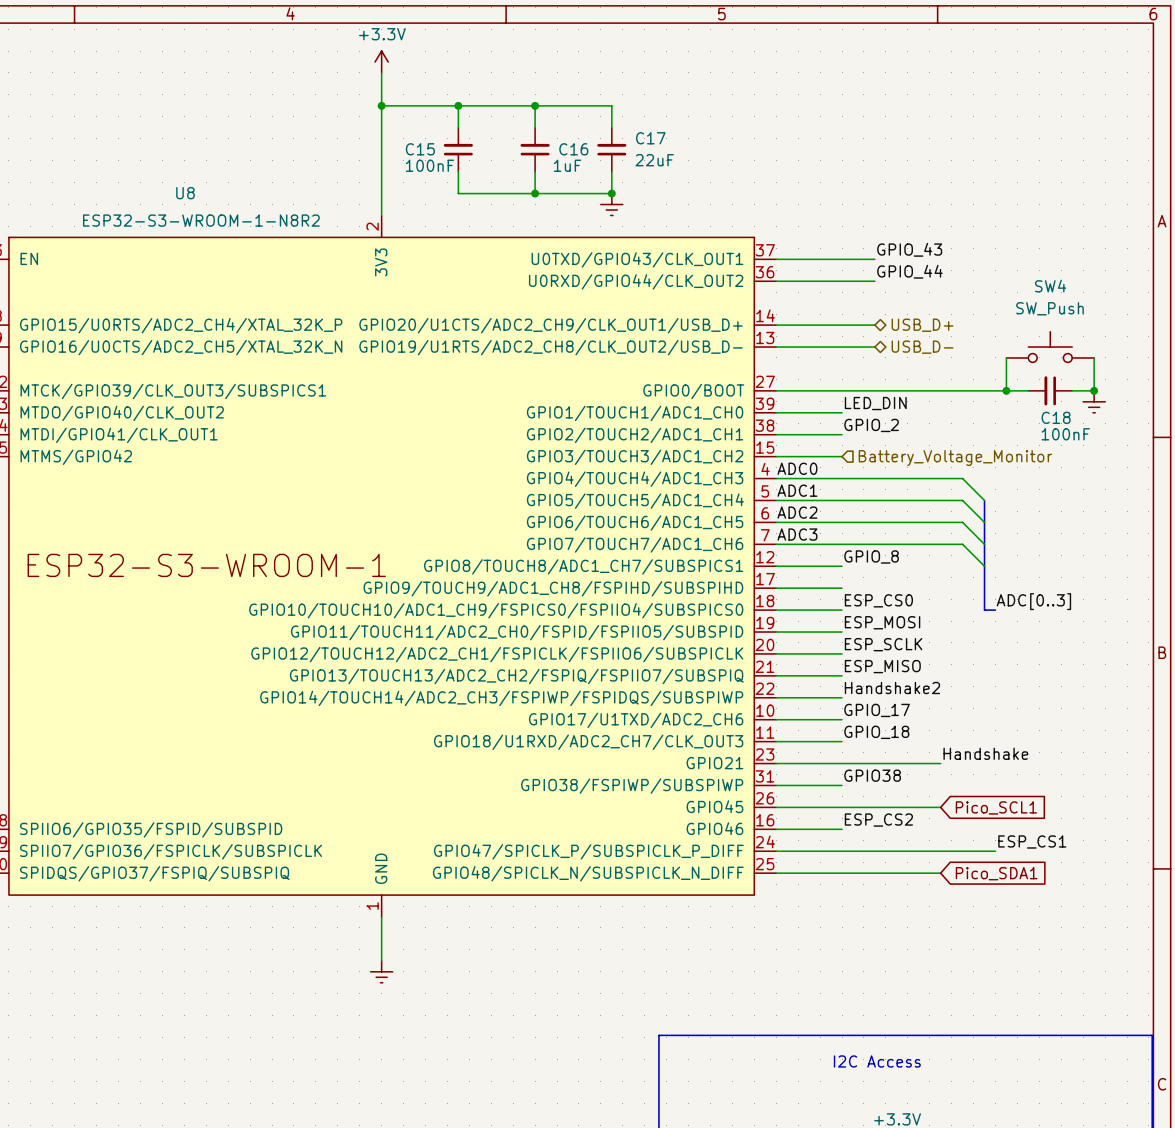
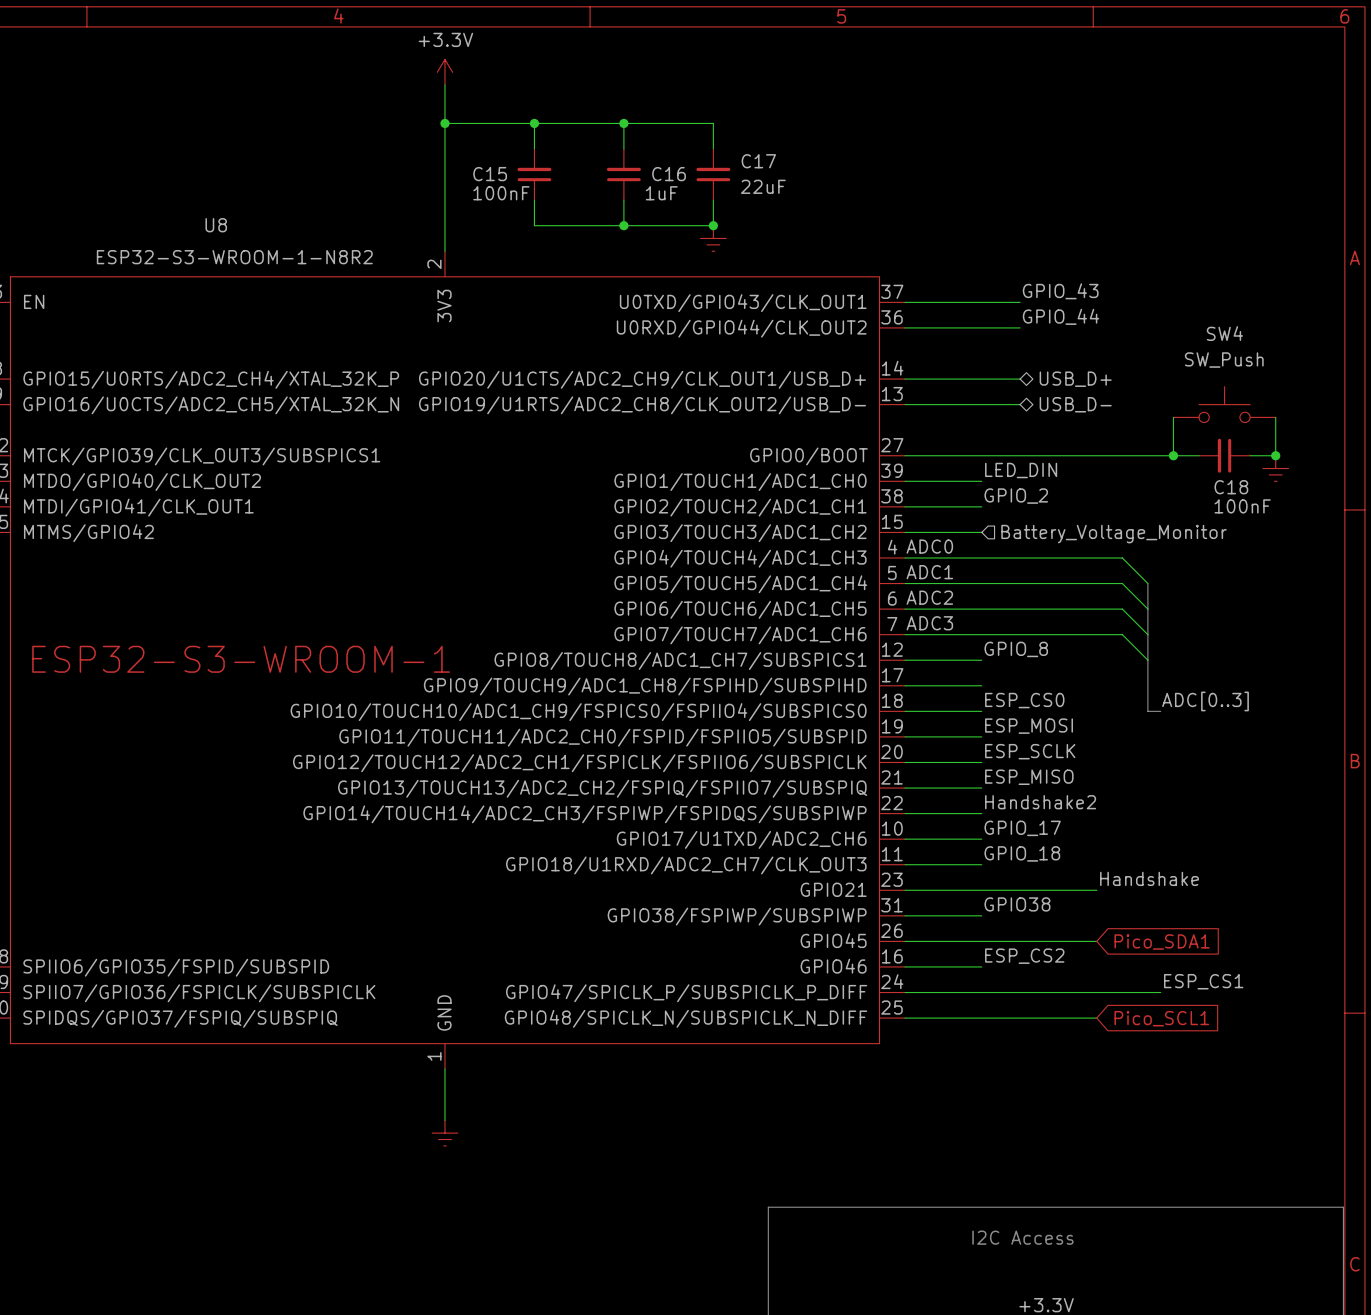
global label: Pico_SCL1 (996, 807) -> Pico_SDA1 (1162, 942)
global label: Pico_SDA1 (996, 873) -> Pico_SCL1 (1161, 1018)

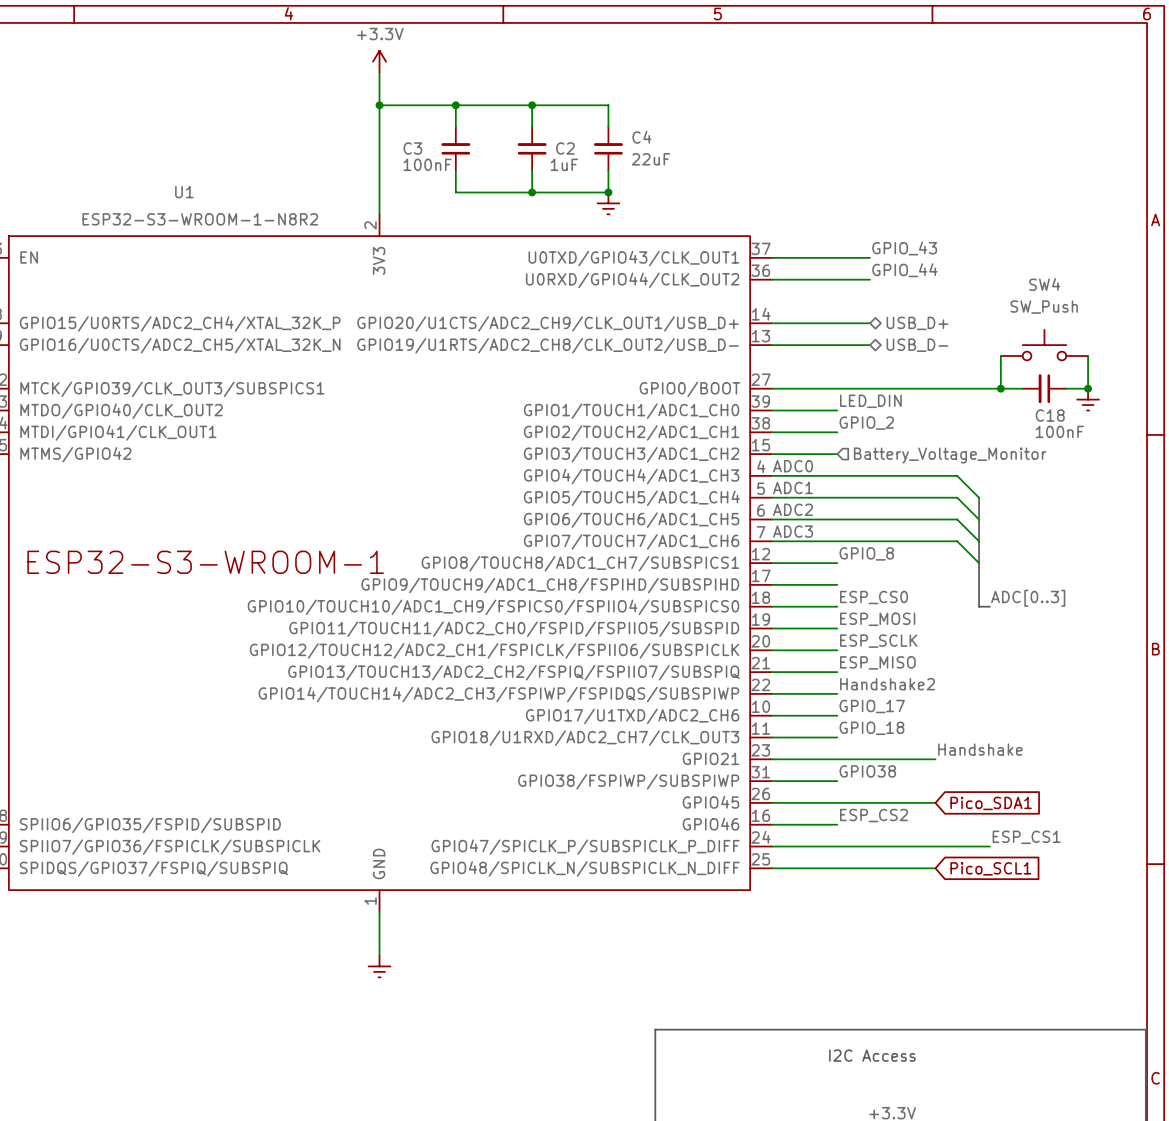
C17 name: C17 (758, 161) -> C4 (641, 137)
C15 name: C15 (490, 174) -> C3 (412, 148)
C16 name: C16 (669, 174) -> C2 (565, 148)
U8 name: U8 (216, 225) -> U1 (184, 192)

